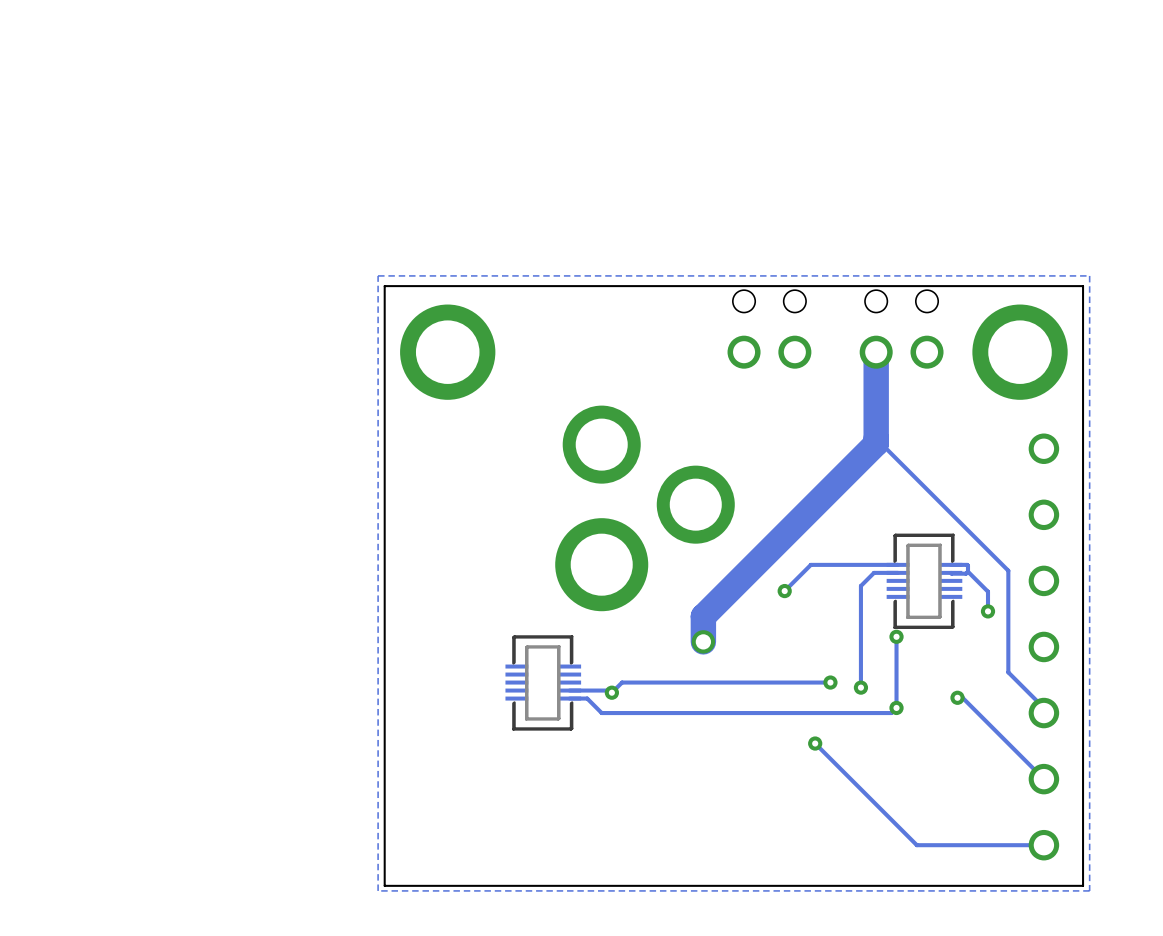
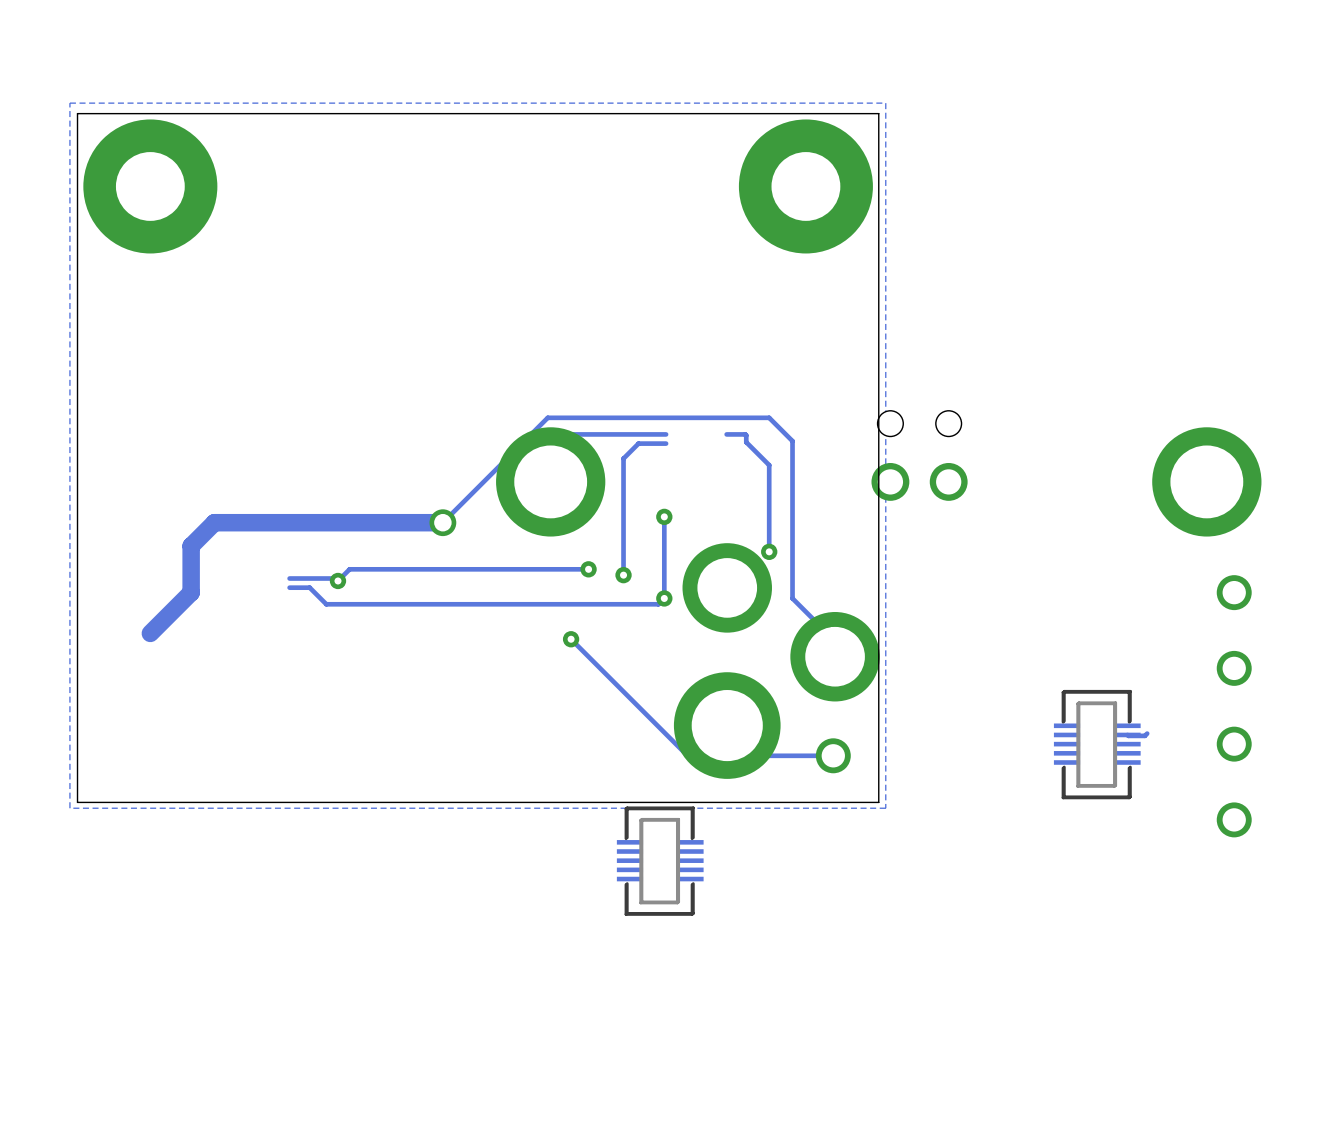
board edge: none -> (878, 113) (878, 802) (77, 802) (77, 113) (878, 113)
part: none -> (150, 186)
part: none -> (805, 186)
zone outline: (1089, 275) (1089, 890) (378, 890) (378, 275) (1089, 275) -> (885, 103) (885, 808) (69, 808) (69, 103) (885, 103)
board edge: (1083, 286) (1083, 885) (384, 885) (384, 286) (1083, 286) -> none
track: none -> (726, 434) (745, 434) (746, 442) (769, 465) (769, 551)
part: (901, 329) -> none
track: (876, 352) (876, 443) (703, 616) (703, 641) -> none
via: none -> (664, 516)
via: none -> (442, 522)
via: none -> (769, 551)
via: none -> (588, 569)
via: none -> (623, 575)
via: none -> (337, 580)
track: (876, 438) (1008, 570) (1008, 672) (1043, 707) (1043, 713) -> none
via: none -> (664, 598)
track: none -> (150, 633) (191, 592) (191, 546) (214, 522) (442, 522) (547, 417) (769, 417) (792, 441) (792, 598) (833, 639)
via: none -> (571, 639)
track: (898, 564) (810, 564) (784, 591) -> (666, 434) (566, 434) (536, 464)
track: (950, 564) (967, 565) (967, 571) (988, 591) (988, 611) -> none
track: (898, 572) (874, 572) (860, 585) (860, 687) -> (666, 443) (638, 443) (623, 458) (623, 575)
part: none -> (833, 755)
via: (784, 591) -> none
via: (988, 611) -> none
track: (896, 636) (896, 707) (891, 713) (601, 713) (587, 698) (569, 698) -> (664, 516) (664, 598) (658, 604) (326, 604) (309, 587) (289, 587)
via: (896, 636) -> none
via: (703, 641) -> none
track: (830, 682) (622, 682) (611, 692) (609, 690) (569, 690) -> (588, 569) (349, 569) (337, 580) (335, 578) (289, 578)
via: (830, 682) -> none
via: (860, 687) -> none
via: (611, 692) -> none
track: (957, 697) (962, 697) (1043, 779) -> none
via: (957, 697) -> none
via: (896, 707) -> none
part: (1043, 713) -> none
track: (815, 743) (916, 845) (1043, 845) -> (571, 639) (687, 755) (833, 755)
via: (815, 743) -> none
part: (1043, 779) -> none
part: (1043, 845) -> none

